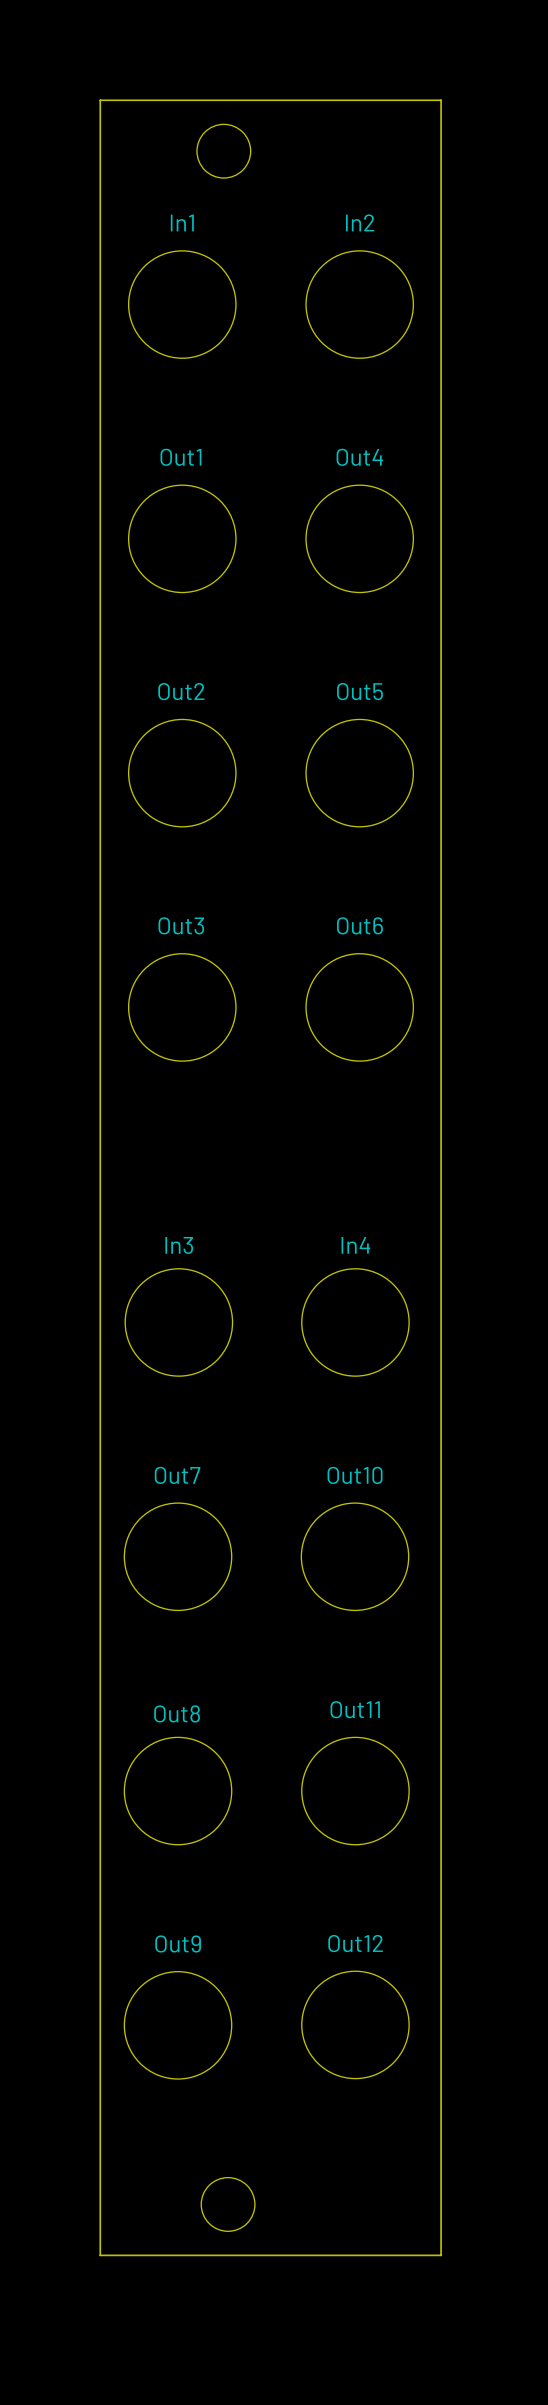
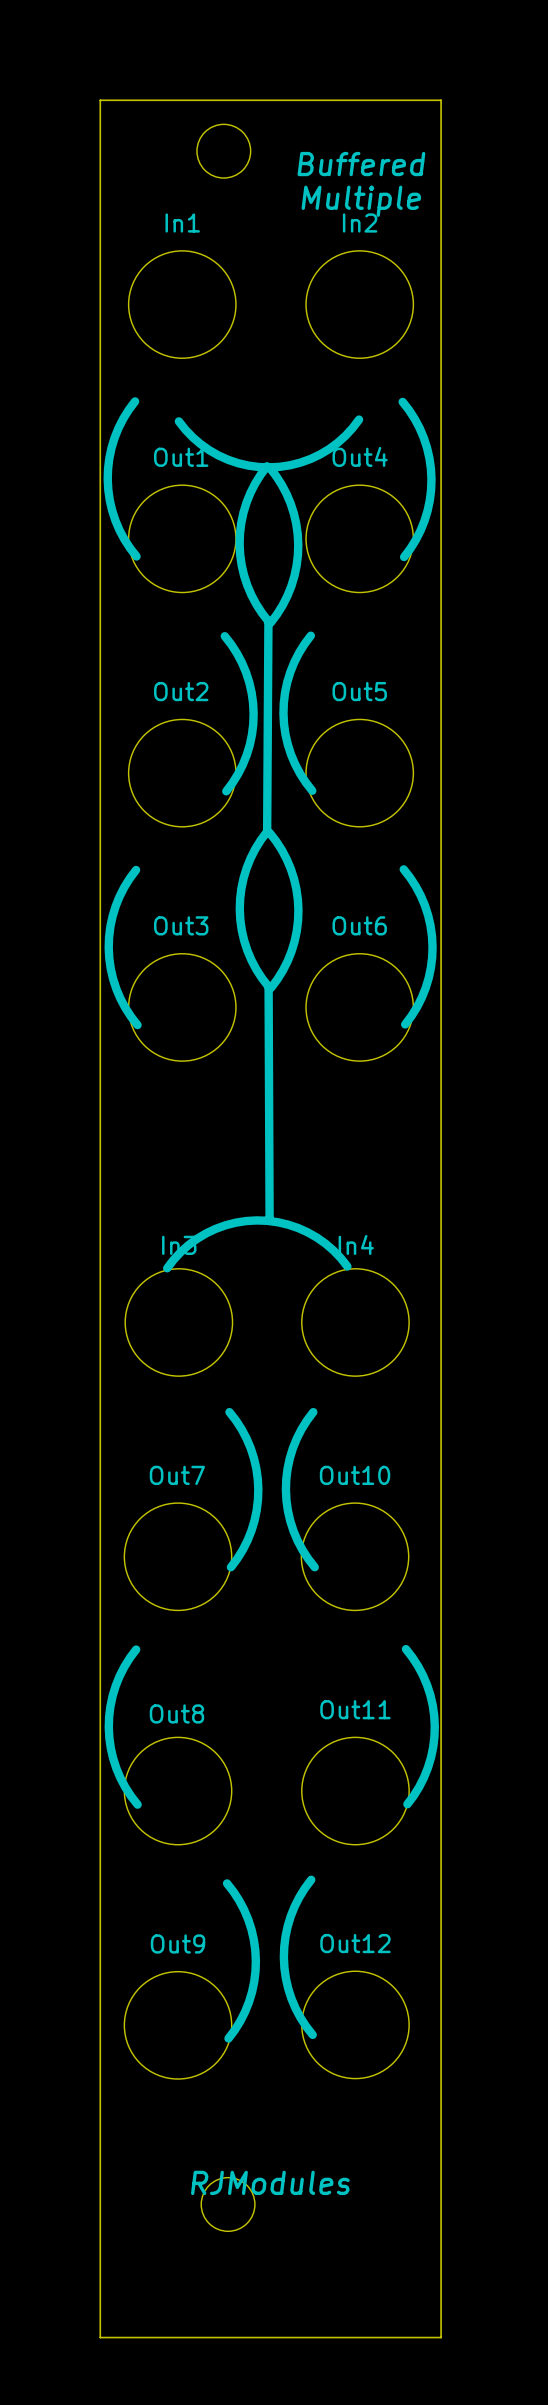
text: none -> Buffered (361, 164)
text: none -> Multiple (361, 201)
line: none -> (135, 401) (123, 418) (114, 437) (109, 458) (107, 479) (109, 500) (115, 520) (124, 539) (136, 556)
line: none -> (402, 401) (414, 419) (423, 438) (429, 458) (431, 479) (429, 500) (424, 520) (415, 539) (404, 557)
line: none -> (359, 419) (345, 435) (320, 454) (290, 465) (269, 467) (248, 465) (218, 455) (200, 444) (178, 421)
line: none -> (266, 466) (255, 483) (246, 502) (239, 533) (240, 554) (244, 575) (251, 594) (268, 621) (267, 831) (255, 849) (246, 868) (241, 888) (239, 909) (241, 930) (247, 950) (256, 969) (268, 986) (269, 1220)
line: none -> (269, 467) (281, 484) (290, 503) (296, 523) (298, 544) (296, 565) (291, 586) (282, 605) (270, 622)
line: none -> (310, 635) (298, 653) (290, 672) (285, 692) (283, 713) (285, 734) (291, 754) (300, 773) (312, 790)
line: none -> (224, 636) (236, 653) (246, 672) (251, 692) (253, 713) (252, 734) (246, 754) (238, 773) (226, 791)
line: none -> (269, 832) (281, 849) (290, 868) (296, 889) (298, 910) (296, 931) (291, 951) (282, 970) (271, 987)
line: none -> (136, 869) (124, 887) (115, 906) (110, 926) (108, 947) (110, 968) (116, 988) (125, 1007) (137, 1025)
line: none -> (403, 869) (415, 886) (424, 905) (430, 925) (432, 946) (430, 967) (425, 987) (417, 1007) (405, 1024)
line: none -> (347, 1266) (333, 1250) (307, 1232) (288, 1224) (256, 1220) (225, 1225) (206, 1233) (188, 1245) (167, 1268)
line: none -> (229, 1412) (241, 1429) (250, 1448) (256, 1468) (258, 1489) (256, 1510) (251, 1530) (242, 1549) (230, 1567)
line: none -> (313, 1412) (301, 1429) (292, 1448) (287, 1468) (285, 1489) (287, 1510) (293, 1531) (302, 1550) (314, 1567)
line: none -> (136, 1649) (124, 1666) (115, 1686) (110, 1706) (108, 1727) (110, 1748) (116, 1768) (125, 1787) (137, 1804)
line: none -> (405, 1649) (418, 1666) (427, 1685) (432, 1705) (434, 1726) (433, 1747) (427, 1767) (419, 1786) (407, 1804)
line: none -> (311, 1879) (299, 1897) (290, 1916) (285, 1936) (283, 1957) (285, 1978) (291, 1998) (300, 2017) (312, 2034)
line: none -> (227, 1883) (239, 1900) (248, 1919) (253, 1939) (255, 1960) (254, 1981) (249, 2002) (240, 2021) (228, 2038)
text: none -> RJModules (270, 2182)
board edge: (100, 2255) (441, 2255) -> (100, 2255) (100, 2337) (441, 2337) (441, 2255)

